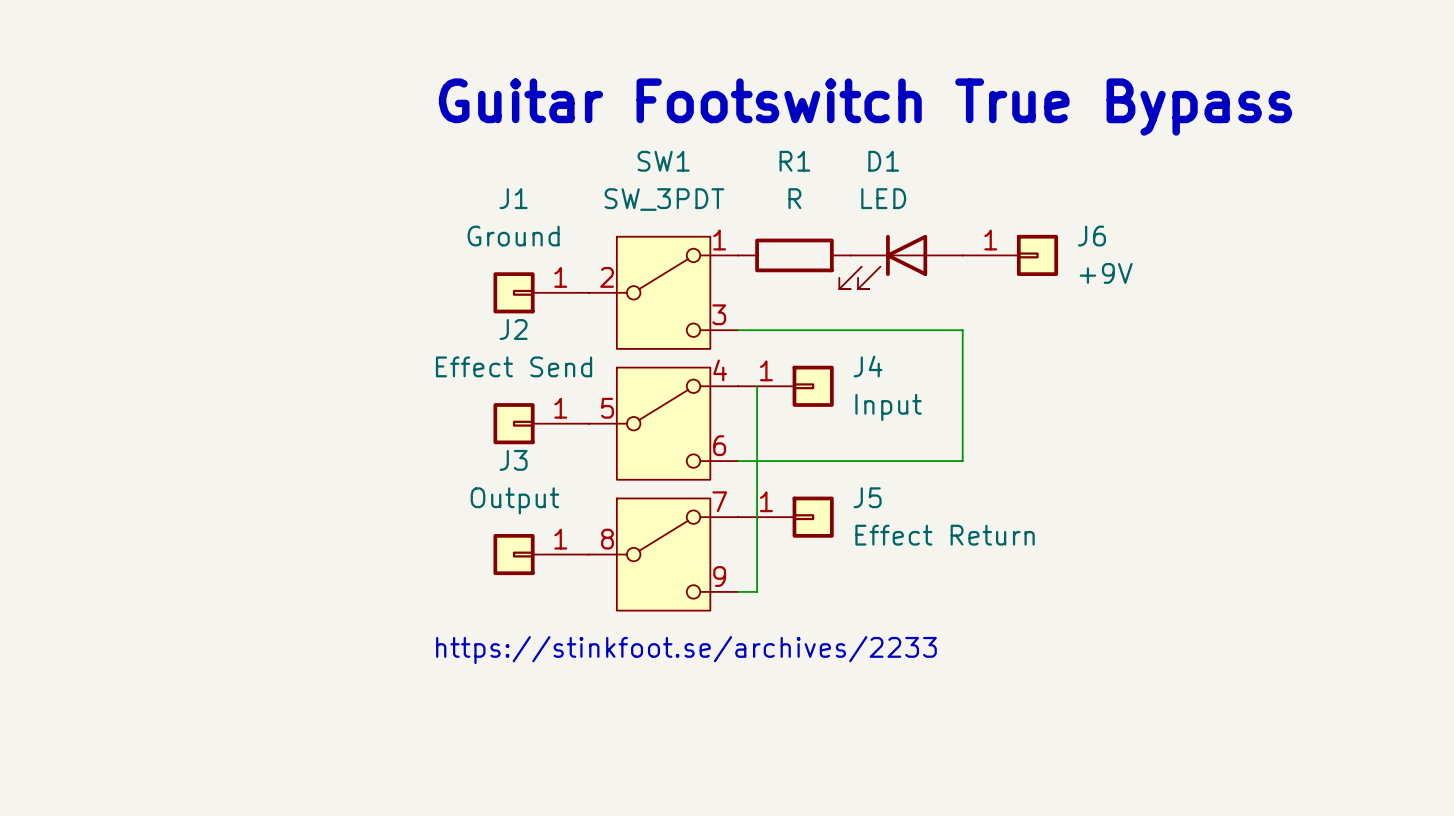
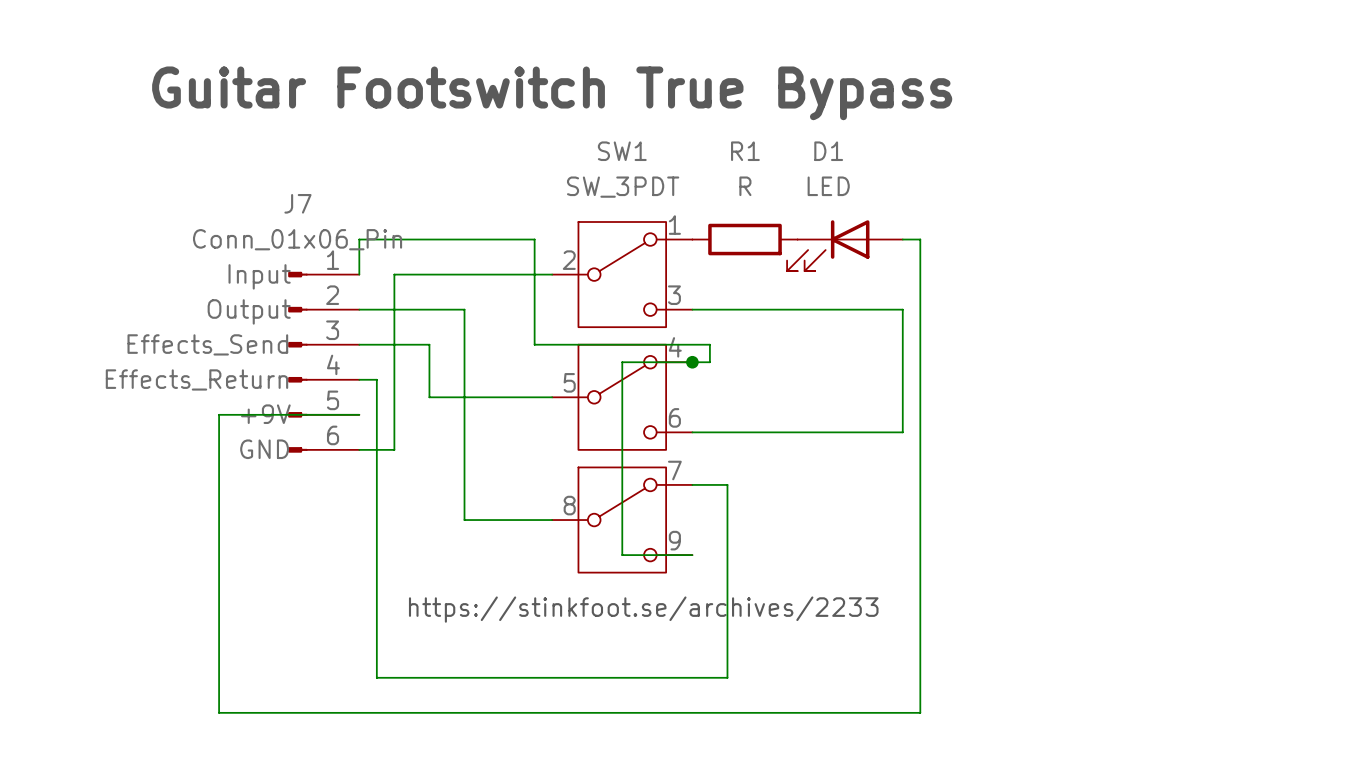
text position: Guitar Footswitch True Bypass (865, 107) -> Guitar Footswitch True Bypass (552, 93)
wire: none -> (902, 239) (920, 239) (920, 712) (219, 712) (219, 414) (359, 414)
J6: +9V (1010, 255) -> none
J1: Ground (541, 292) -> none
wire: none -> (552, 274) (394, 274) (394, 449) (359, 449)
wire: none -> (359, 309) (464, 309) (464, 520) (552, 520)
wire: none -> (359, 344) (429, 344) (429, 397) (552, 397)
J7: none -> Conn_01x06_Pin (323, 362)
junction: none -> (692, 362)
wire: (757, 386) (757, 591) (738, 591) -> (359, 274) (359, 239) (534, 239) (534, 344) (709, 344) (709, 362) (622, 362) (622, 555) (692, 555)
J4: Input (786, 386) -> none
wire: none -> (359, 379) (376, 379) (376, 677) (727, 677) (727, 484) (692, 484)
J2: Effect Send (541, 423) -> none
J5: Effect Return (786, 517) -> none
J3: Output (541, 554) -> none

